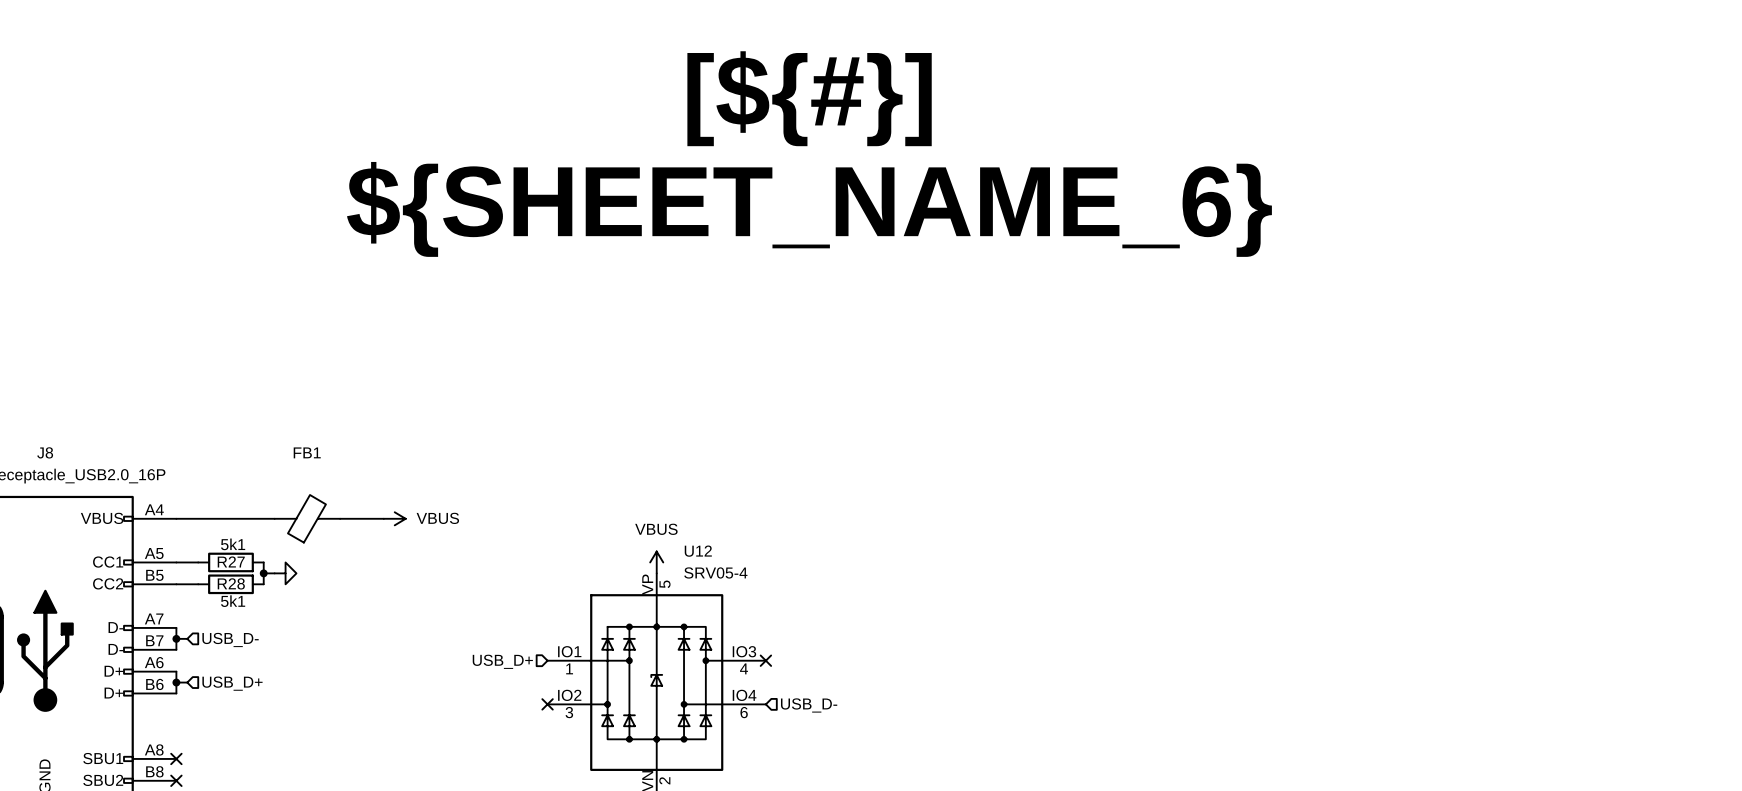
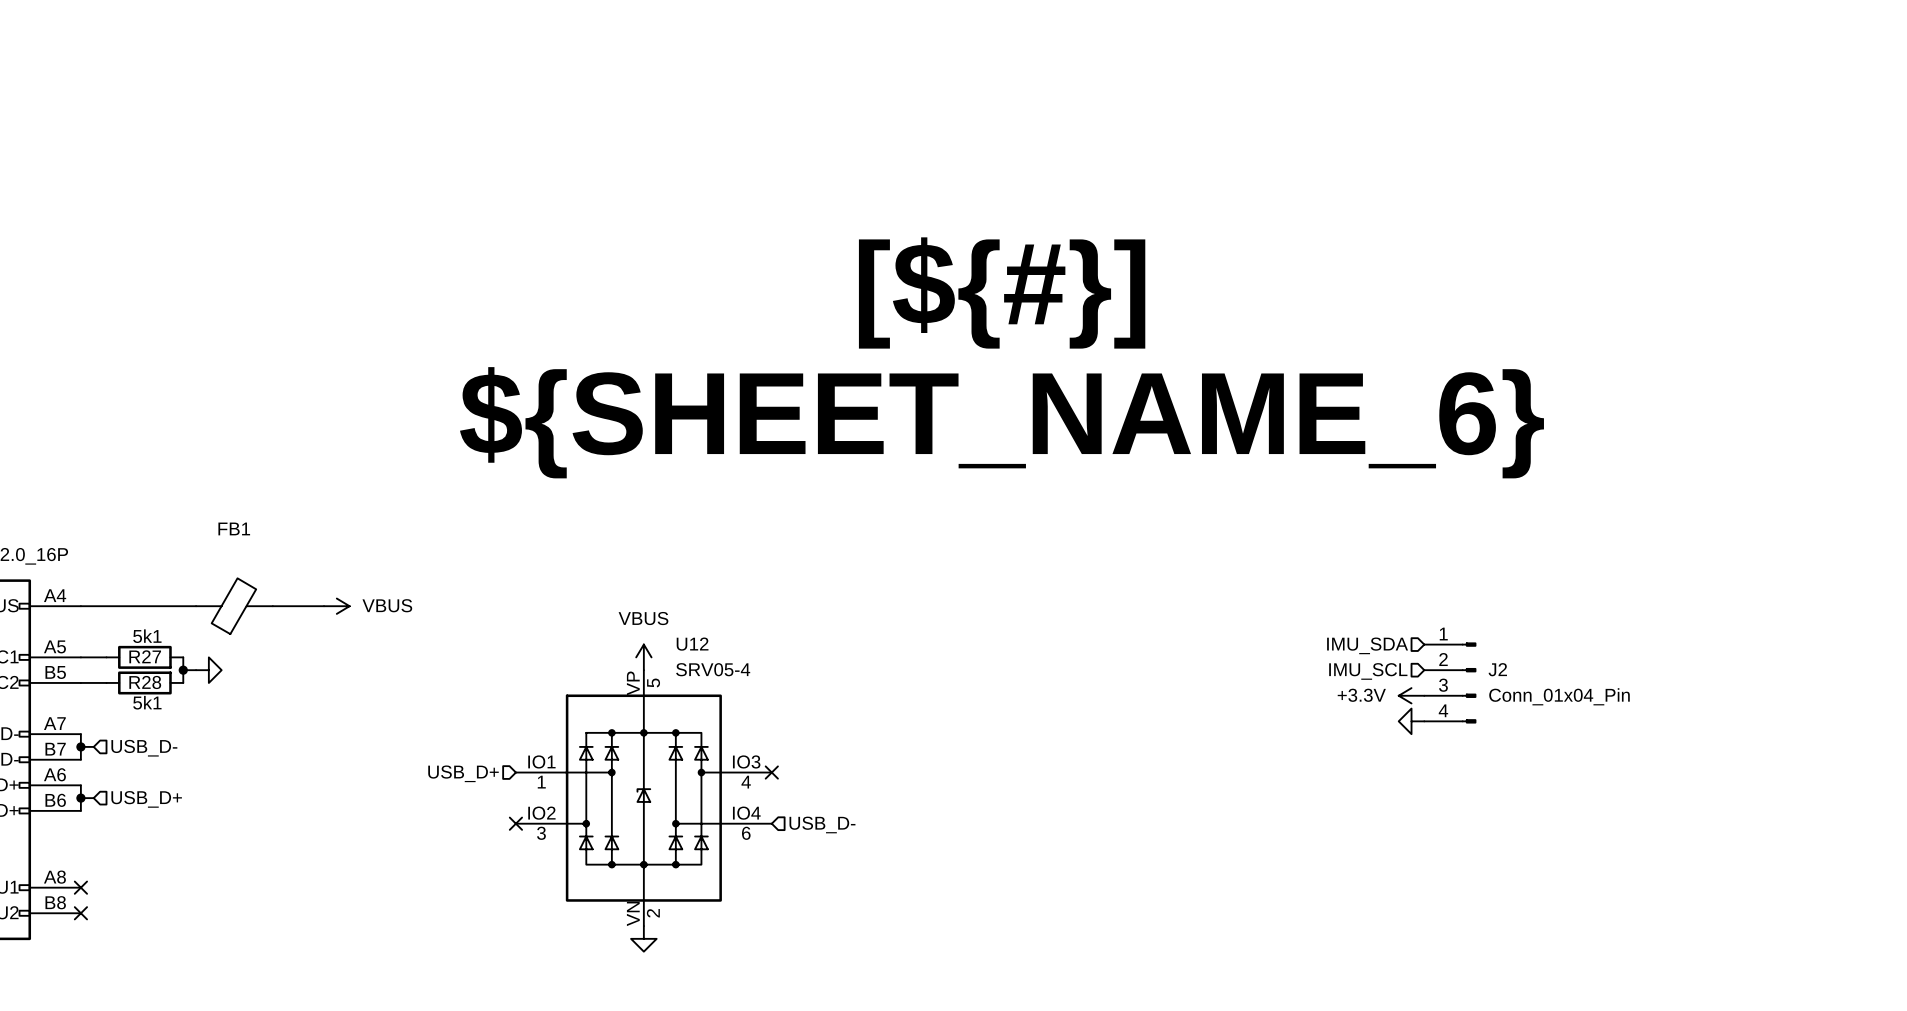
text: [${#}] (809, 98) -> none
text: ${SHEET_NAME_6} (809, 209) -> none
text: none -> [${#}] (1002, 292)
text: none -> ${SHEET_NAME_6} (1001, 422)
hierarchical label: none -> IMU_SDA (1367, 645)
hierarchical label: none -> IMU_SCL (1368, 671)
J2: none -> Conn_01x04_Pin (1450, 682)
power symbol: none -> +3.3V (1411, 695)
power symbol: none -> (1411, 721)

